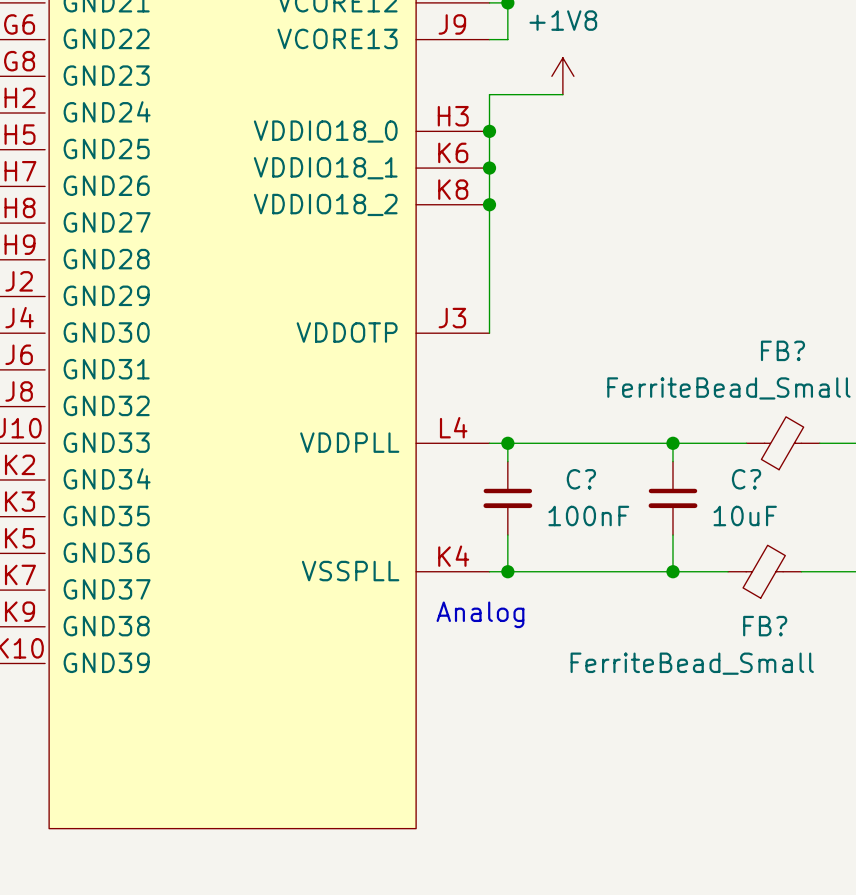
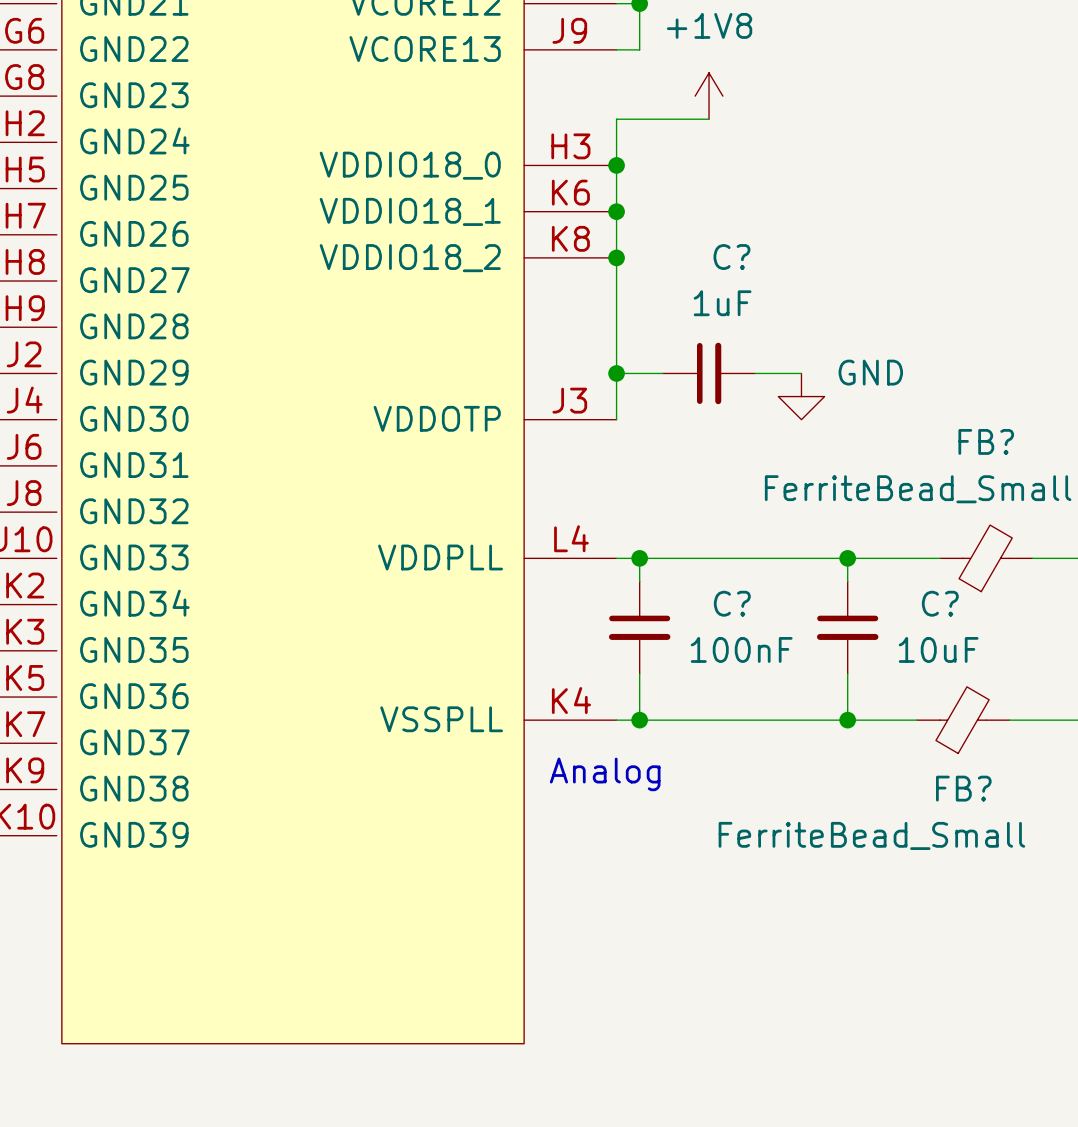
wire: none -> (616, 373) (662, 373)
junction: none -> (616, 373)
C?: none -> 1uF (709, 373)
wire: none -> (755, 373) (801, 373)
power symbol: none -> GND (801, 396)

